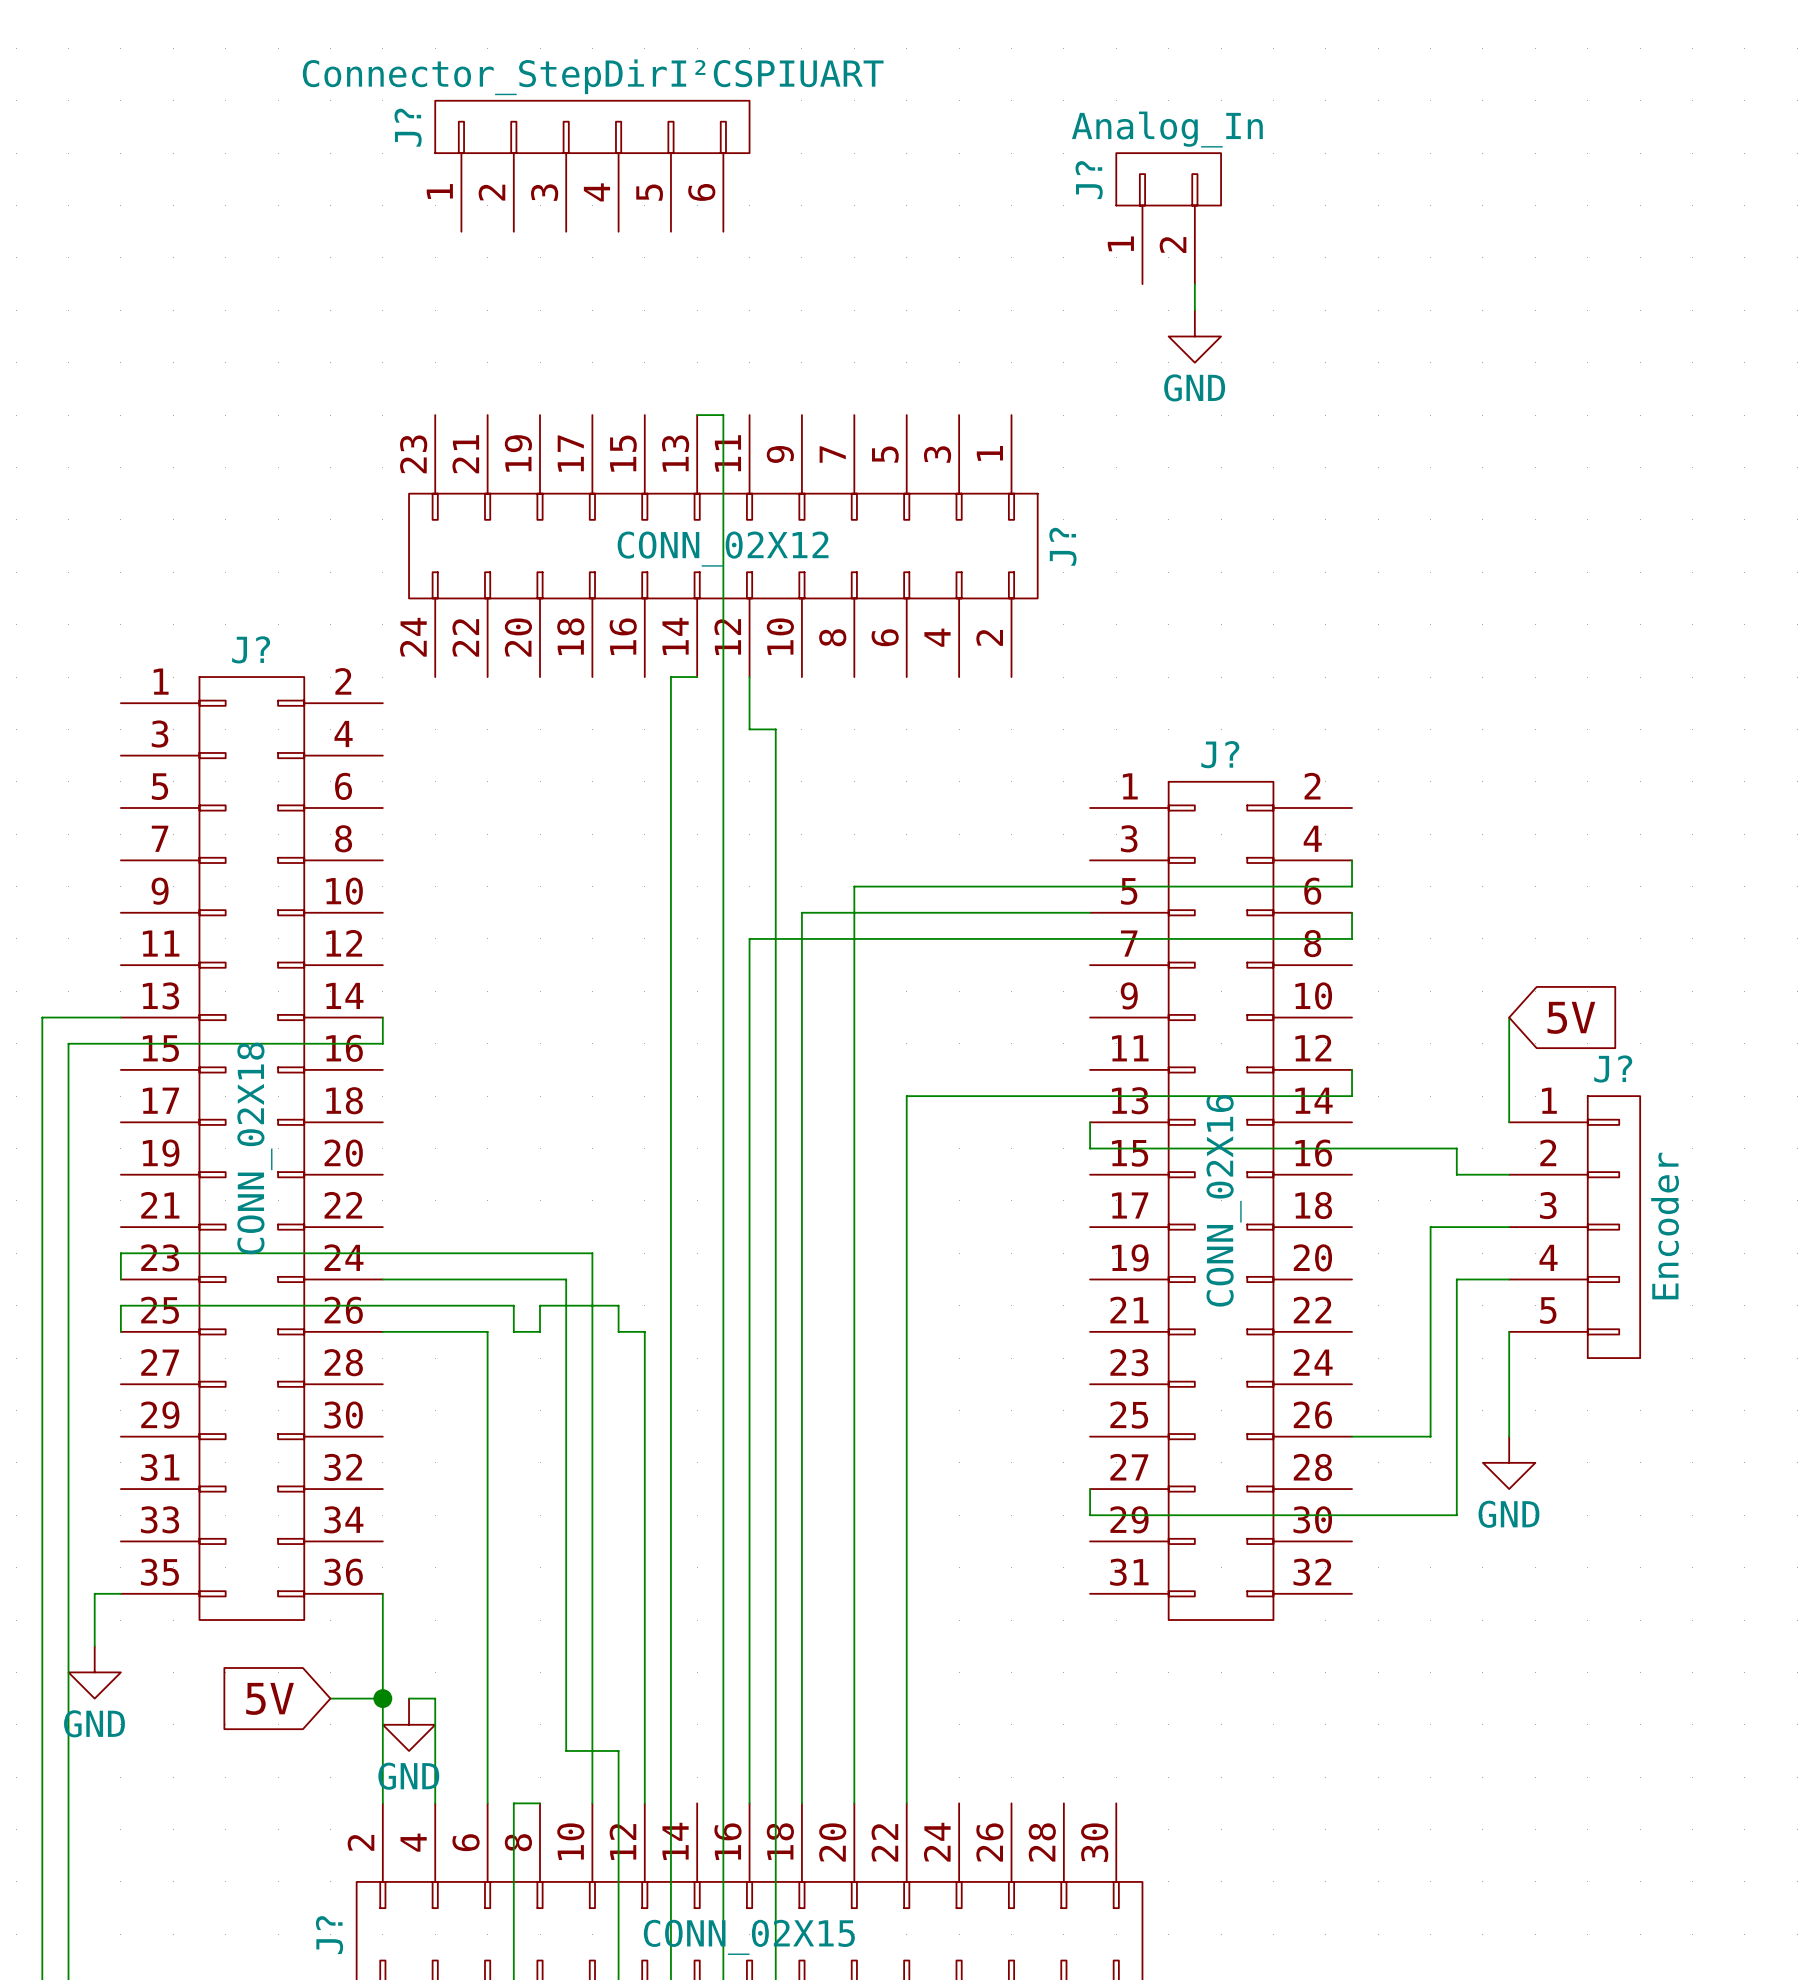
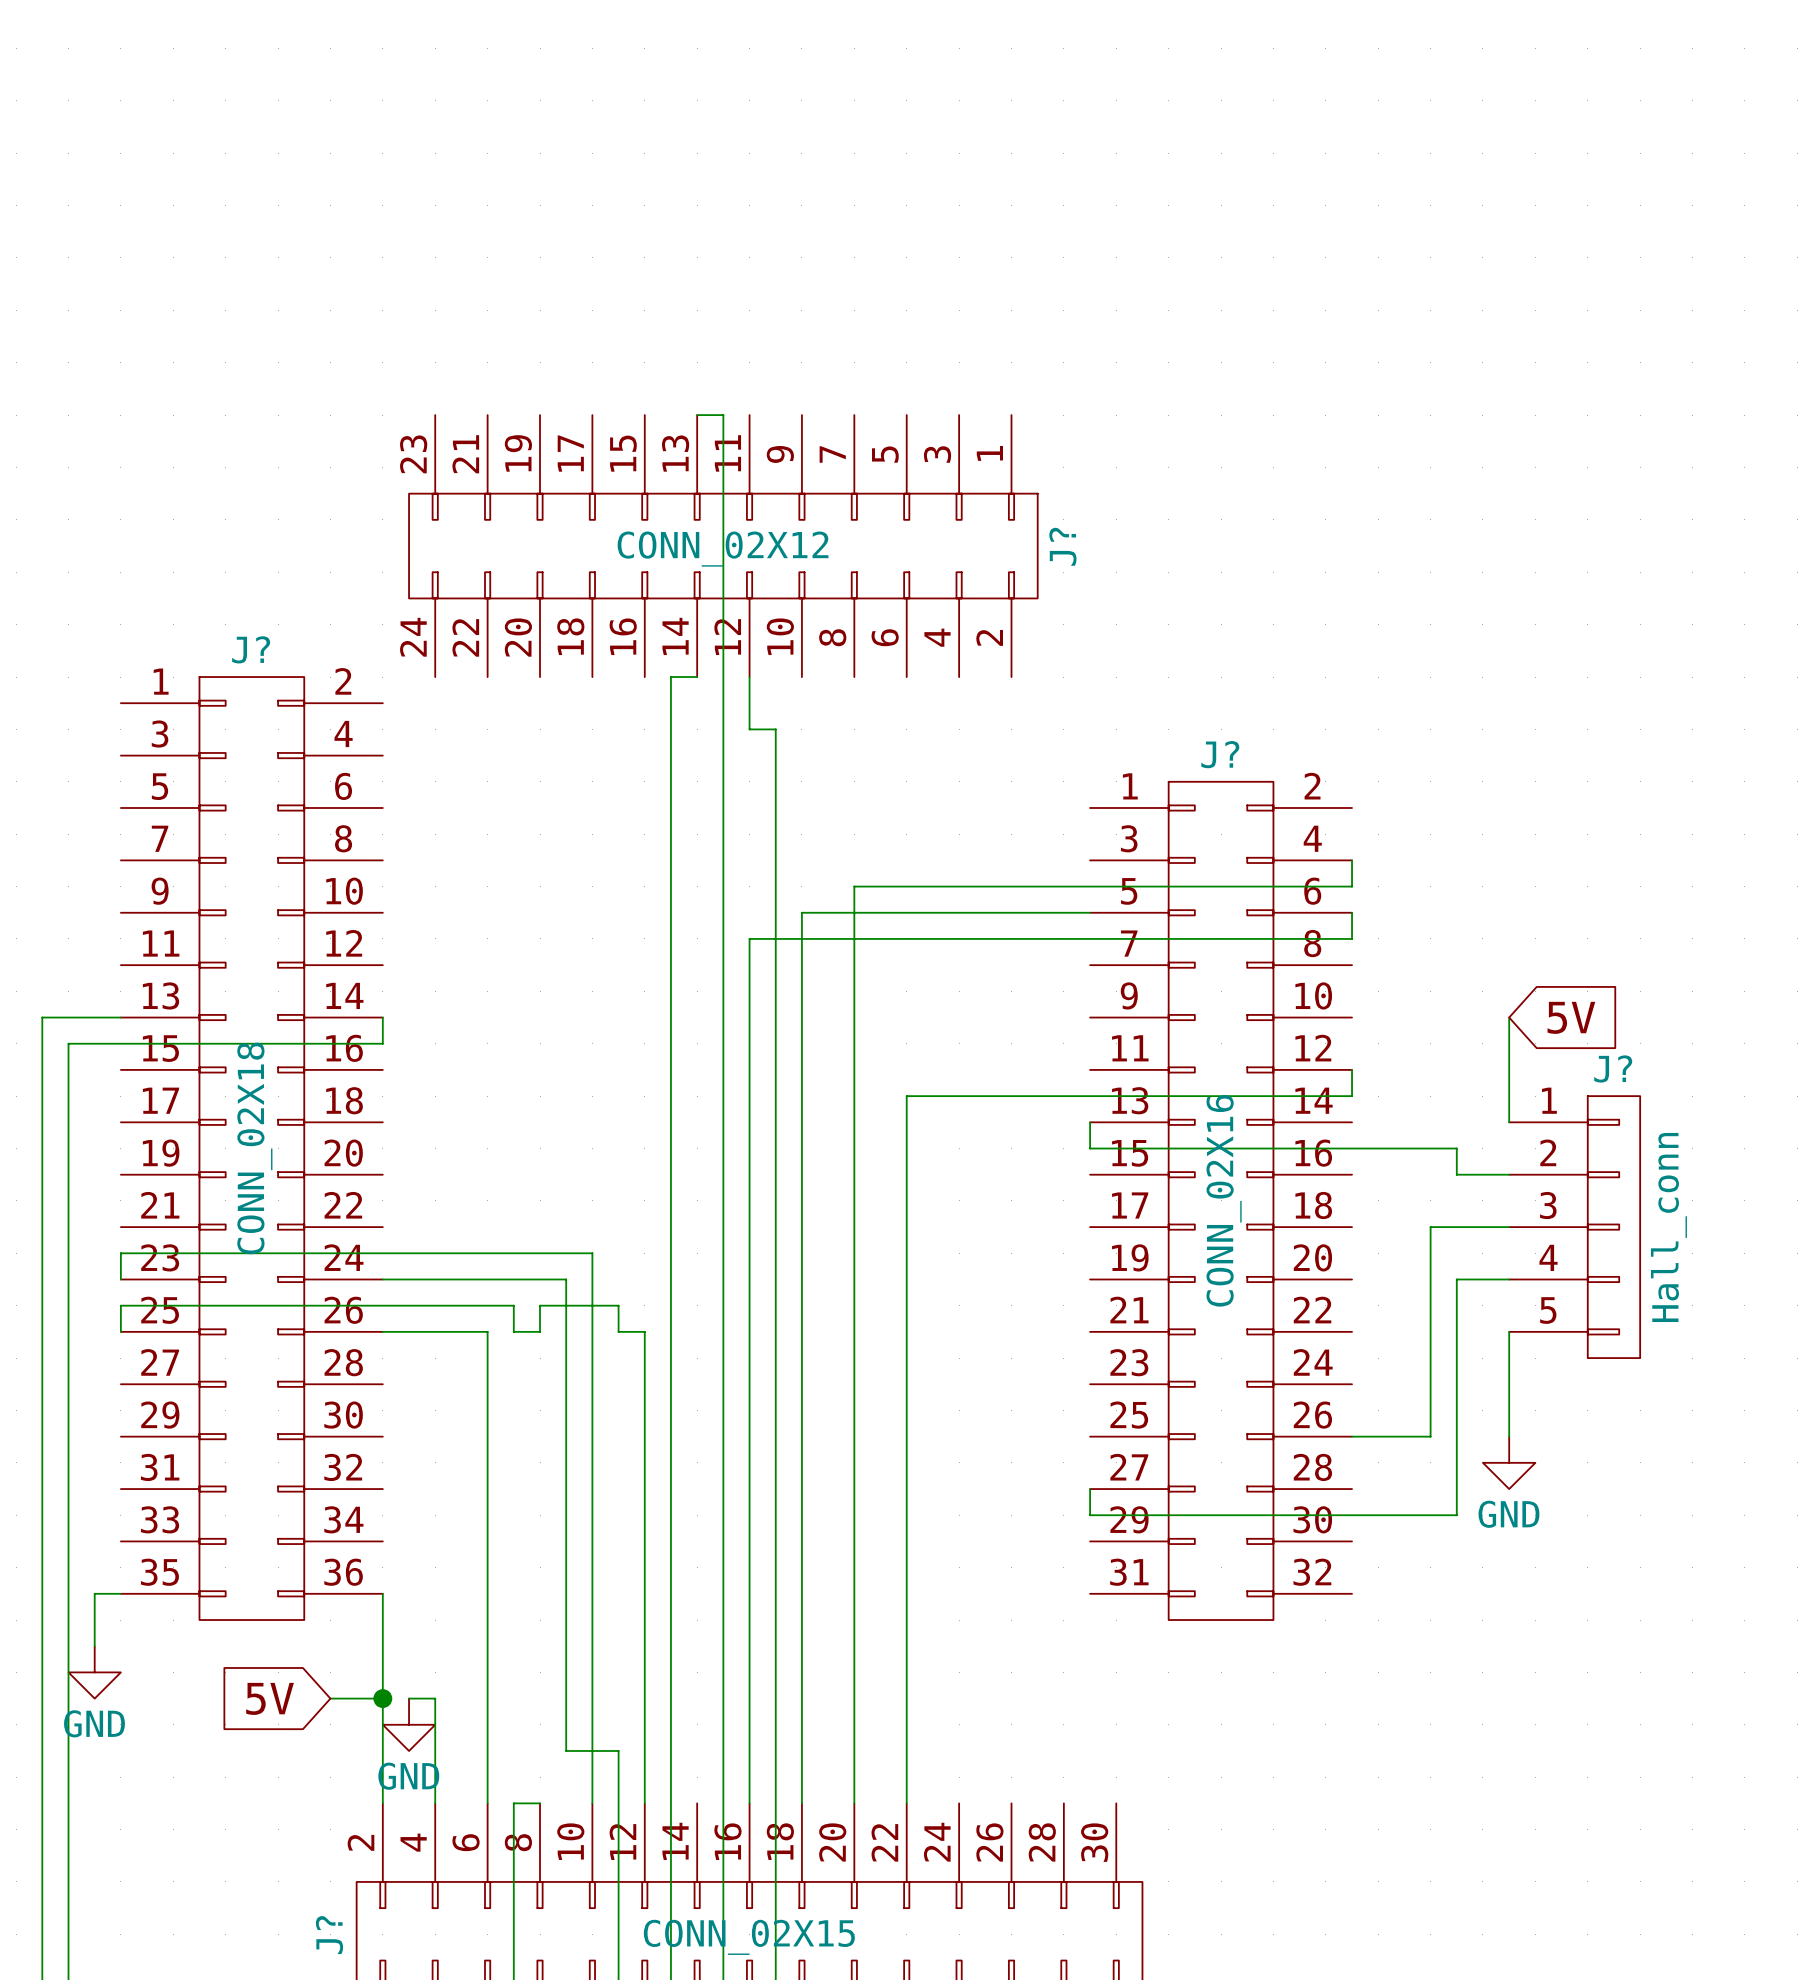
J?: Connector_StepDirI²CSPIUART (592, 166) -> none
J?: Analog_In (1168, 218) -> none
wire: (1194, 284) (1194, 310) -> none
power symbol: GND (1194, 336) -> none
J? value: Encoder (1665, 1226) -> Hall_conn (1668, 1227)

